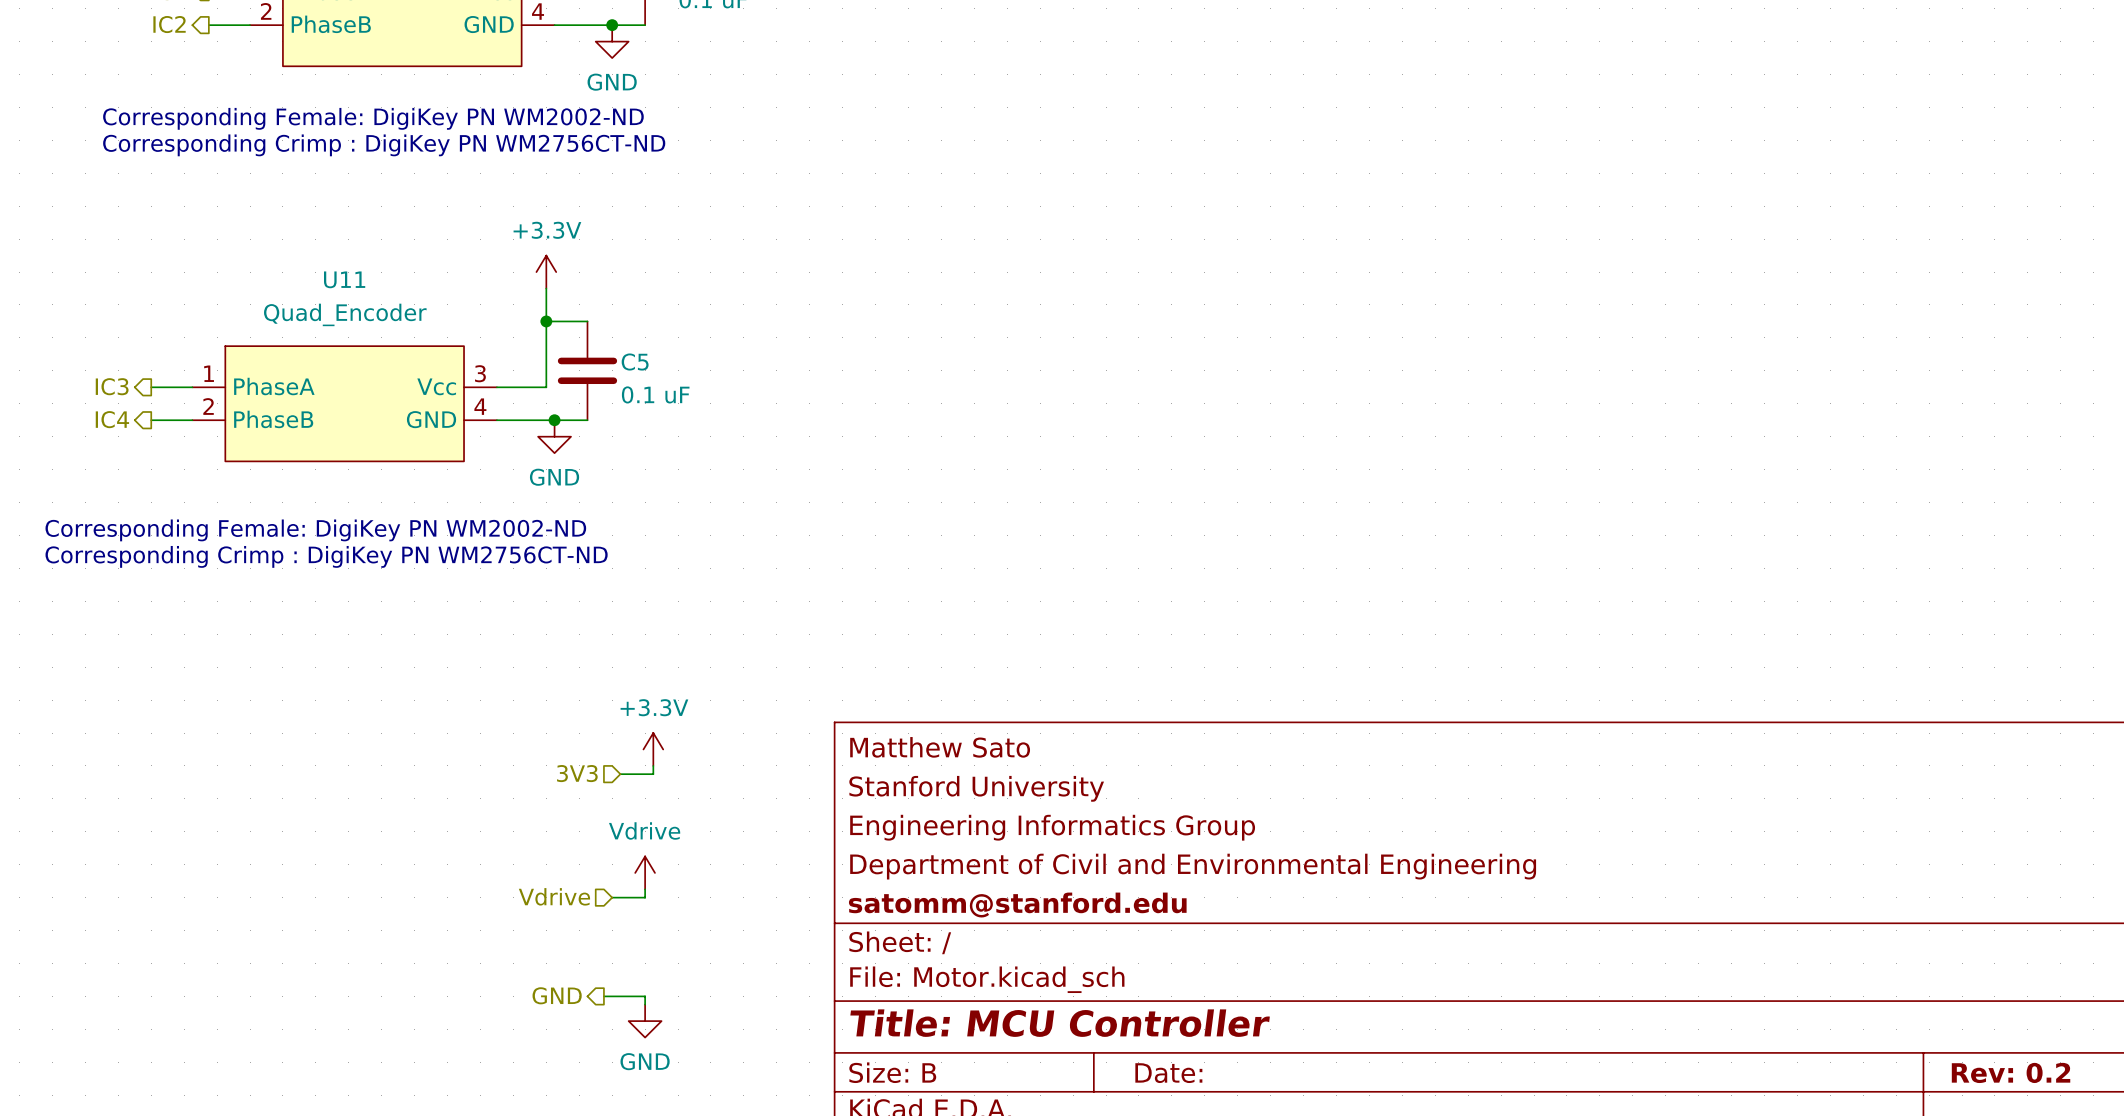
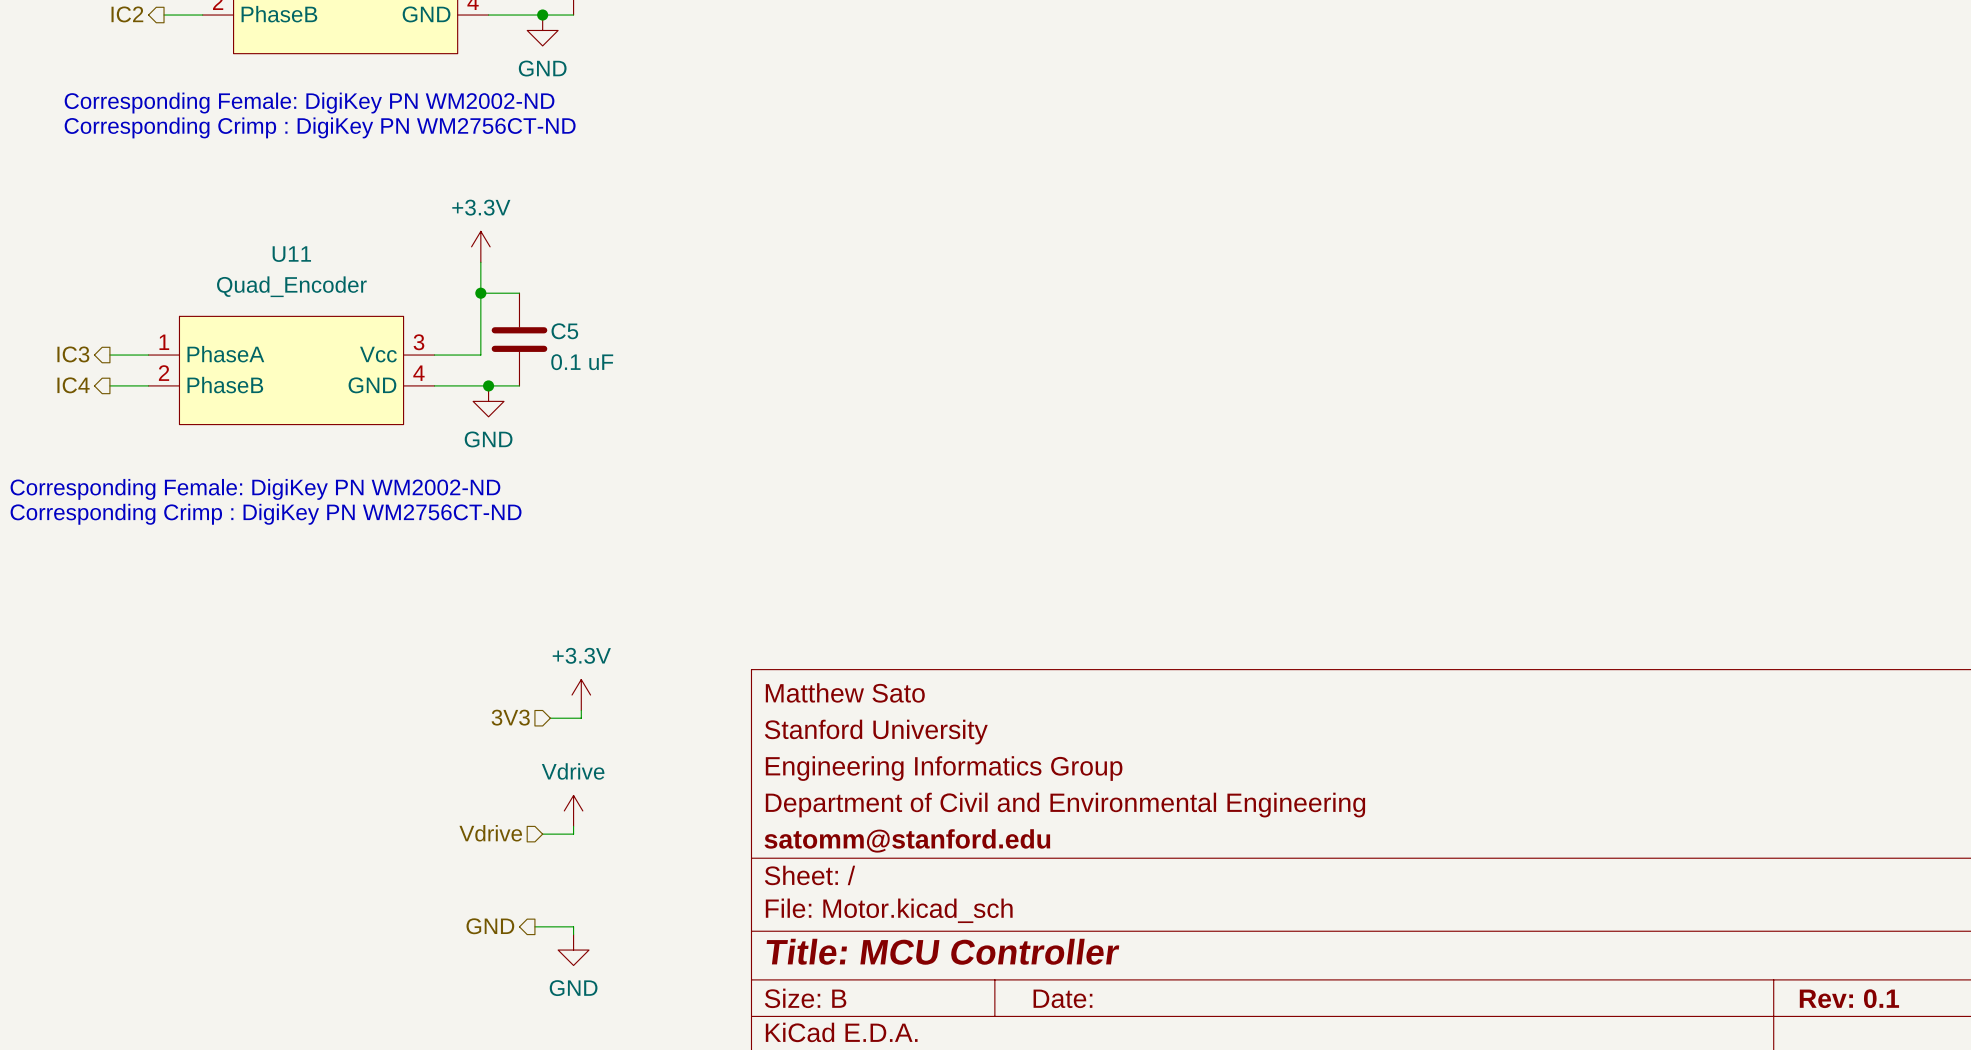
title block: Rev: 0.2 (2011, 1072) -> Rev: 0.1 (1849, 998)

